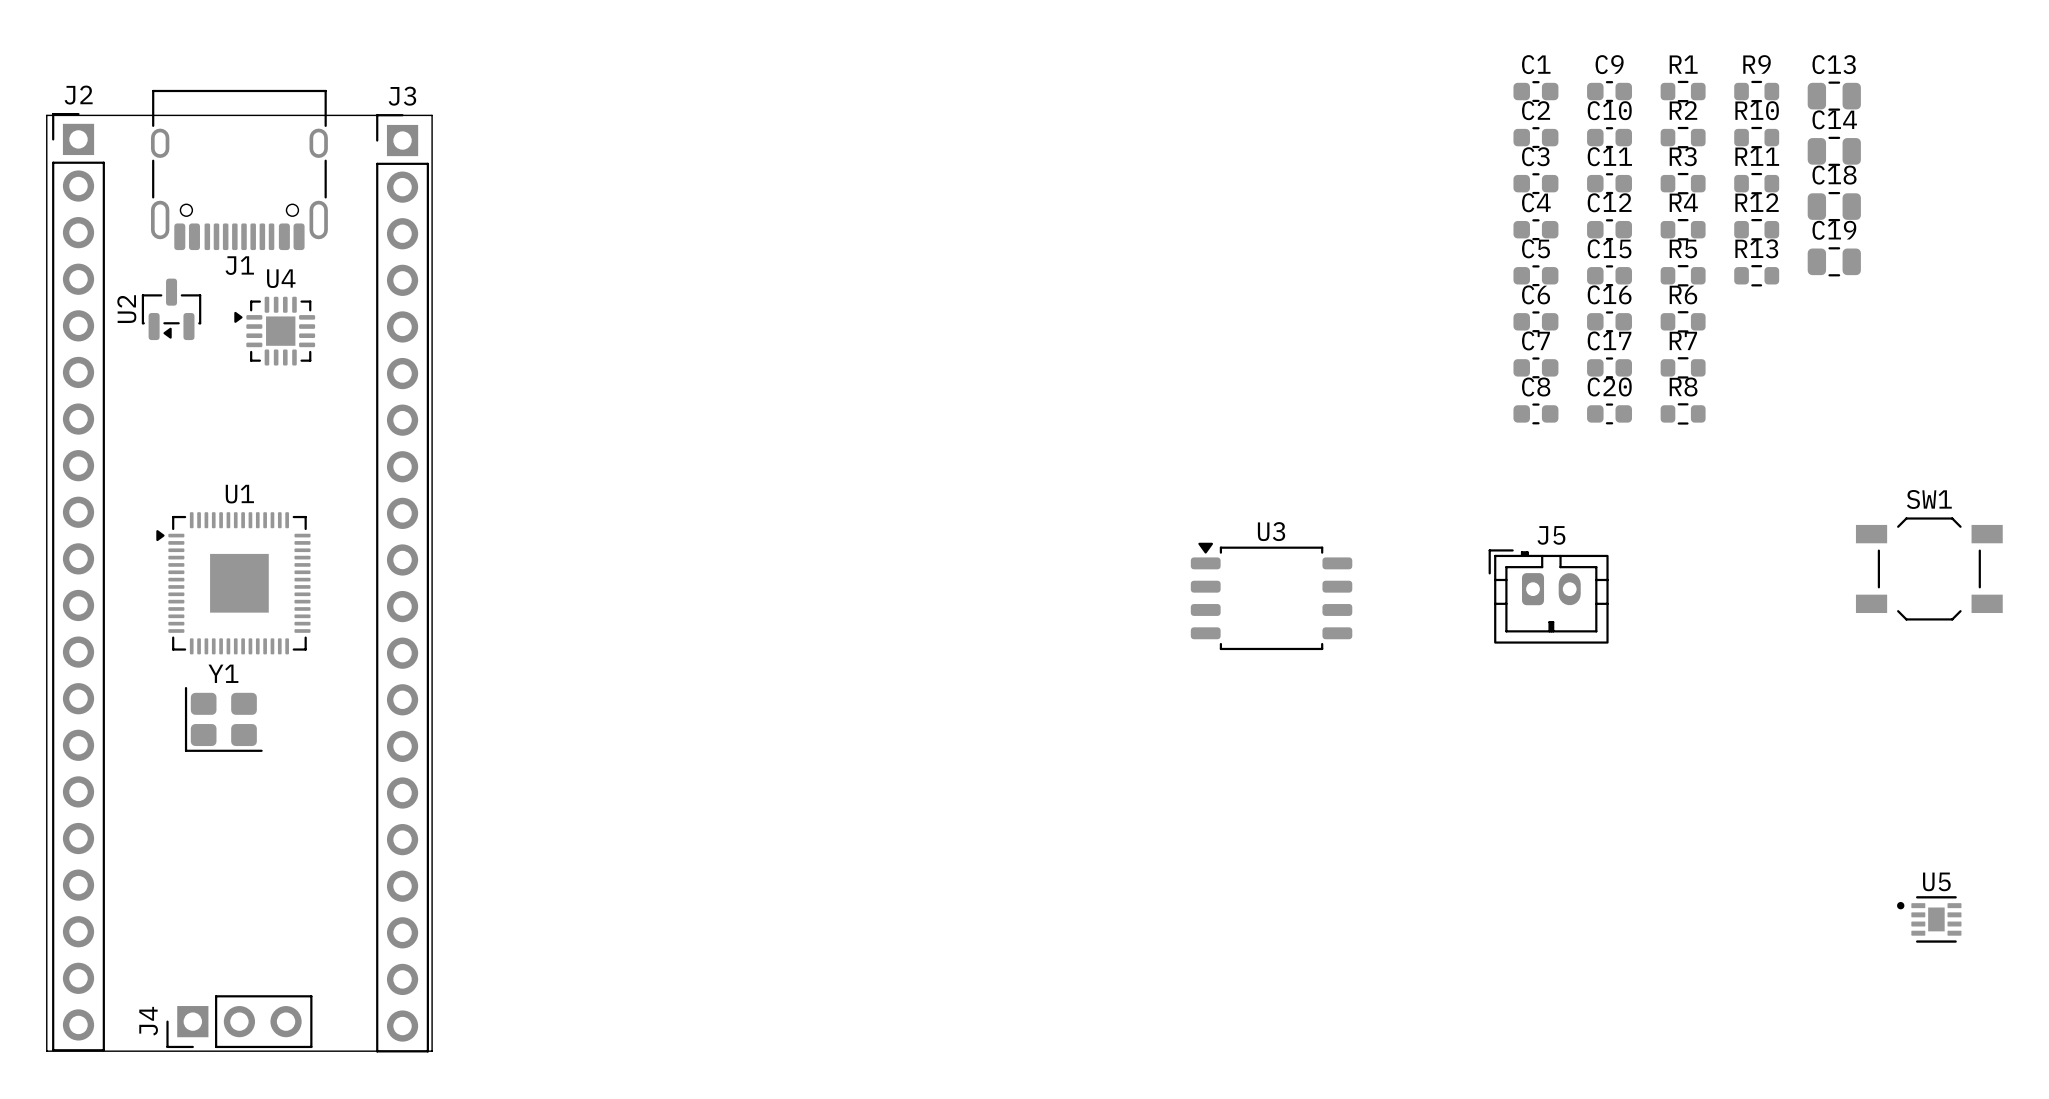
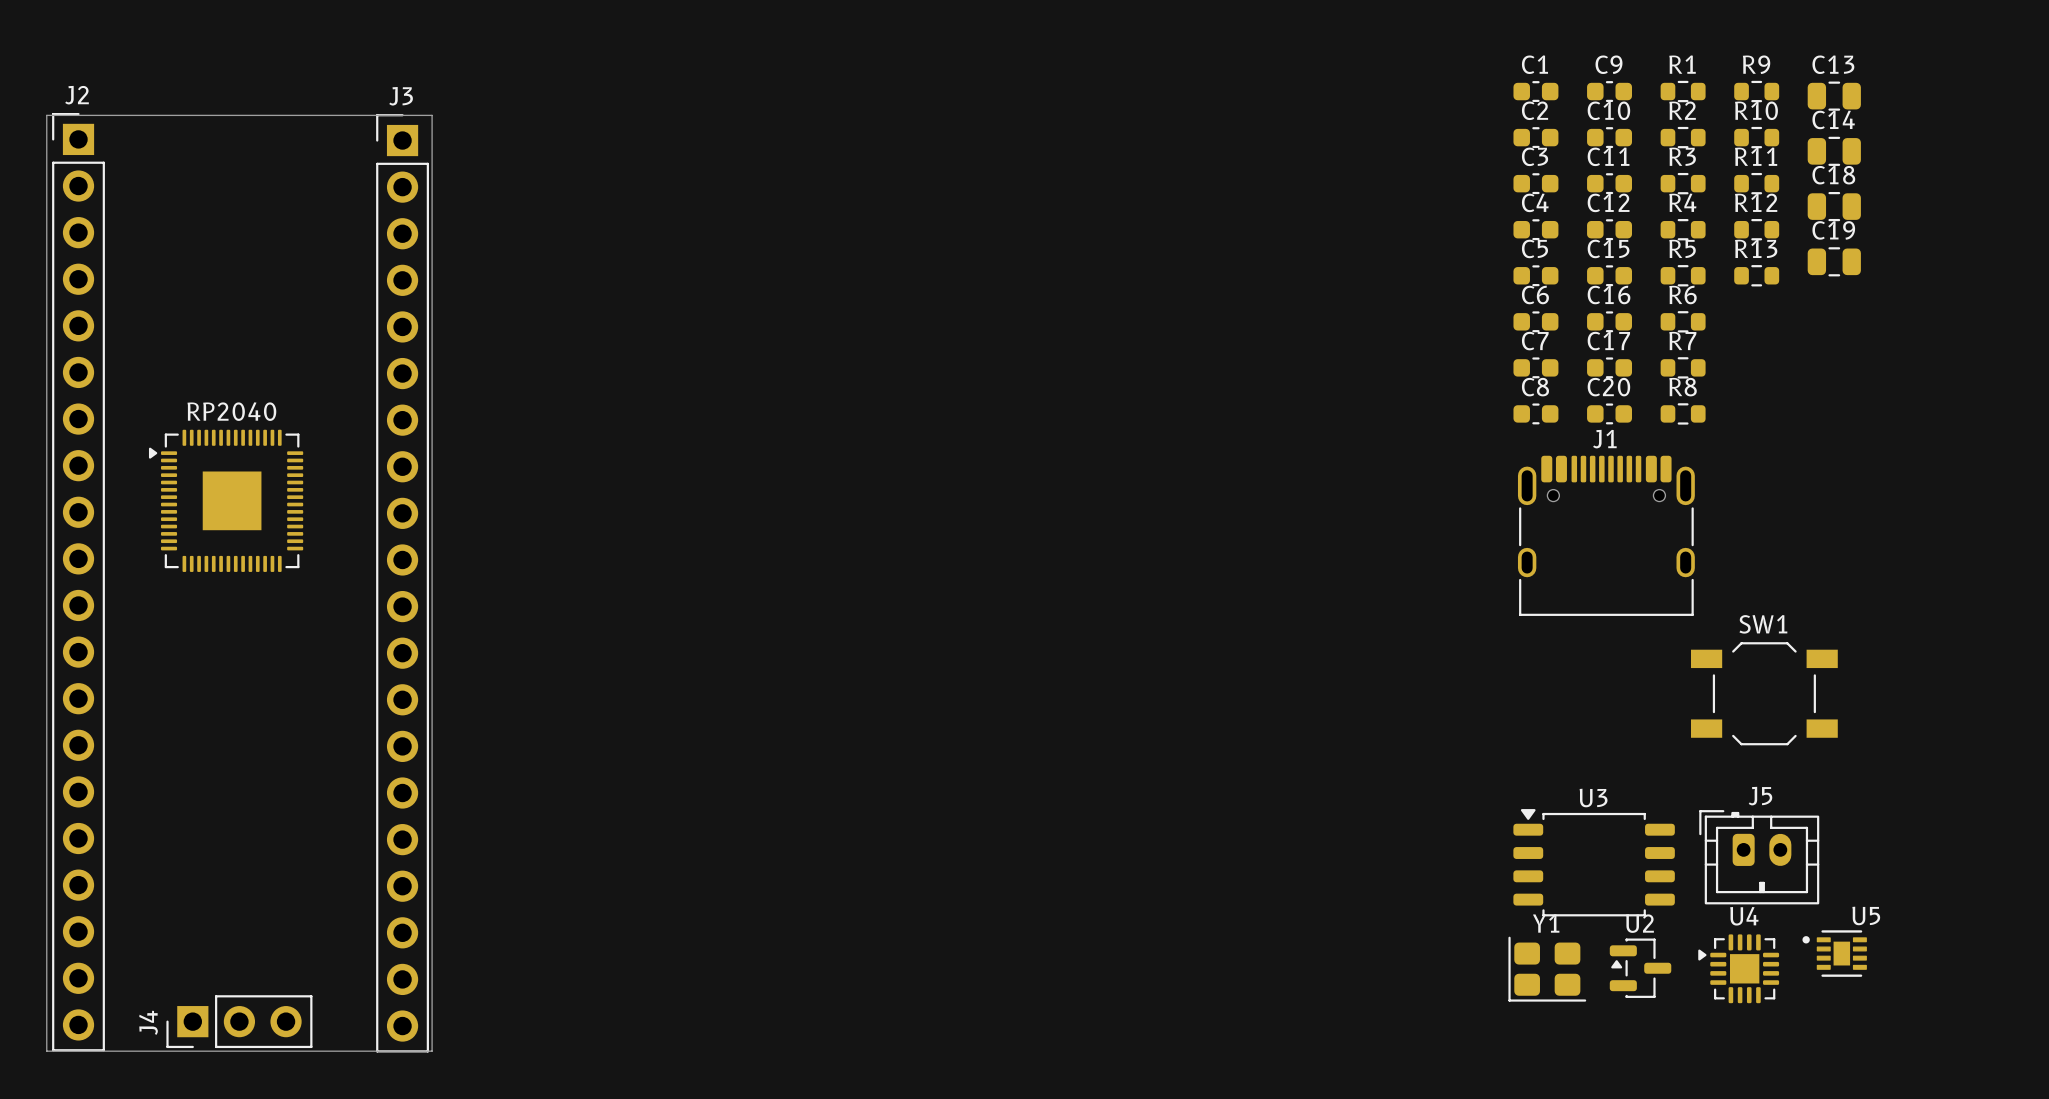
J1 rotation: 0° (239, 169) -> 180° (1606, 535)
J1 position: (239, 169) -> (1606, 535)
U2 rotation: 0° (171, 309) -> 90° clockwise (1640, 968)
U2 position: (171, 309) -> (1640, 968)
U4 position: (274, 331) -> (1738, 968)
RP2040: none -> (226, 500)
SW1 position: (1929, 568) -> (1764, 693)
U1: (233, 583) -> none
U3 position: (1271, 596) -> (1594, 862)
J5 position: (1548, 596) -> (1759, 857)
Y1 position: (223, 719) -> (1547, 969)
U5 name position: U5 (1936, 881) -> U5 (1866, 915)
U5 position: (1929, 919) -> (1834, 953)

